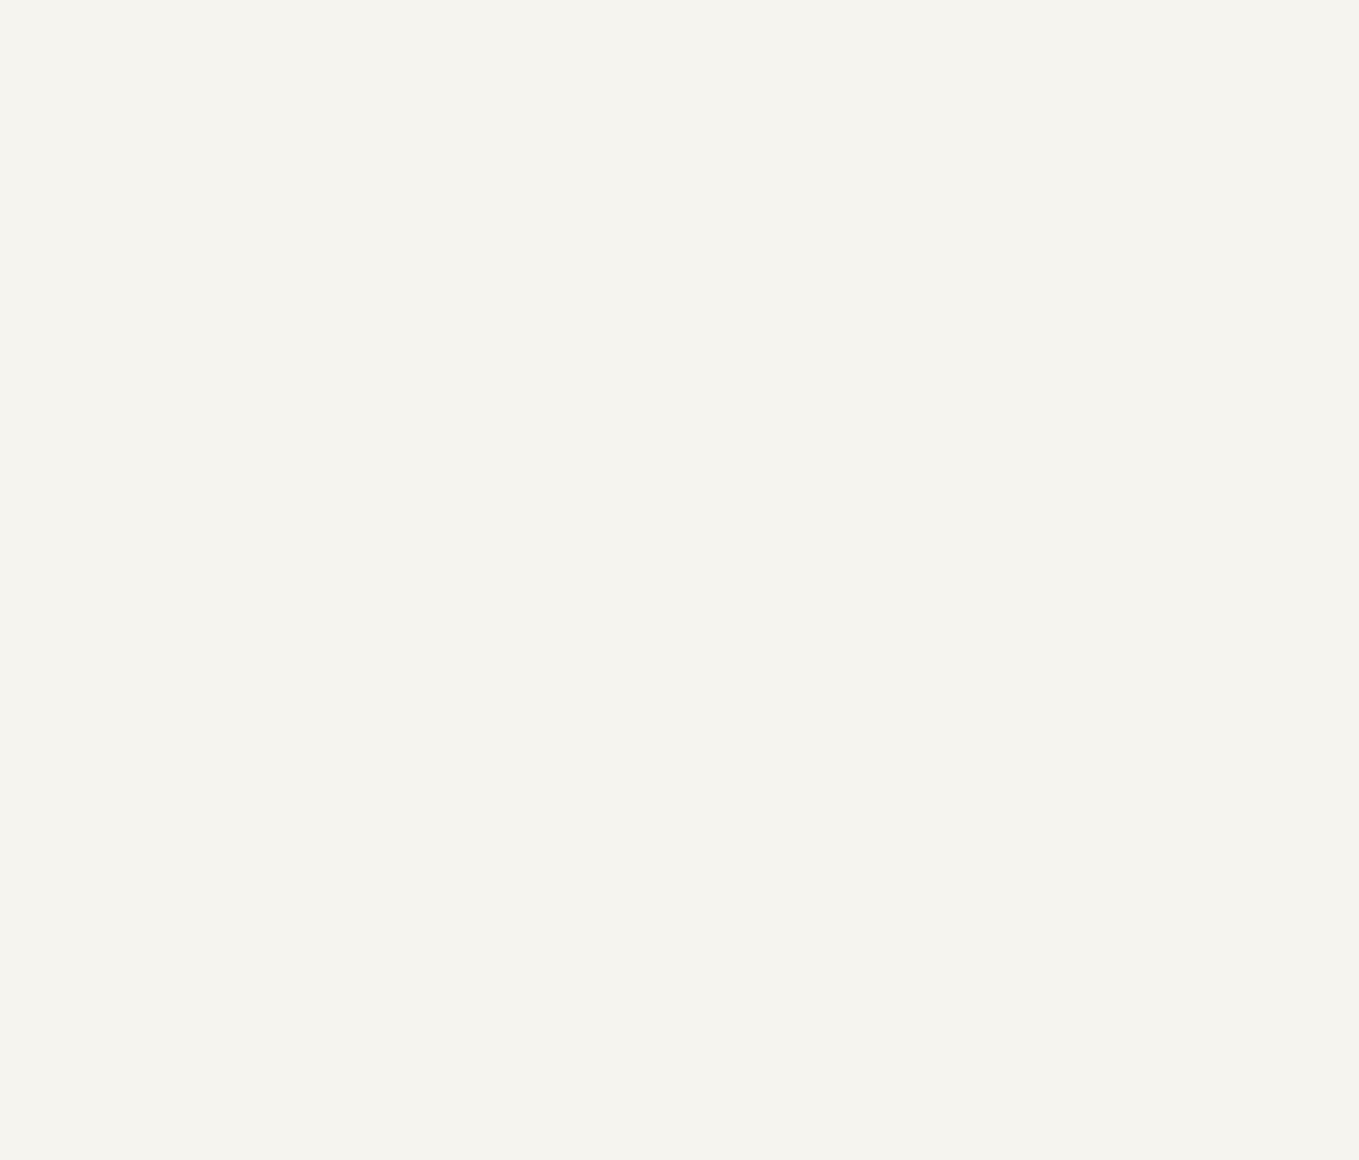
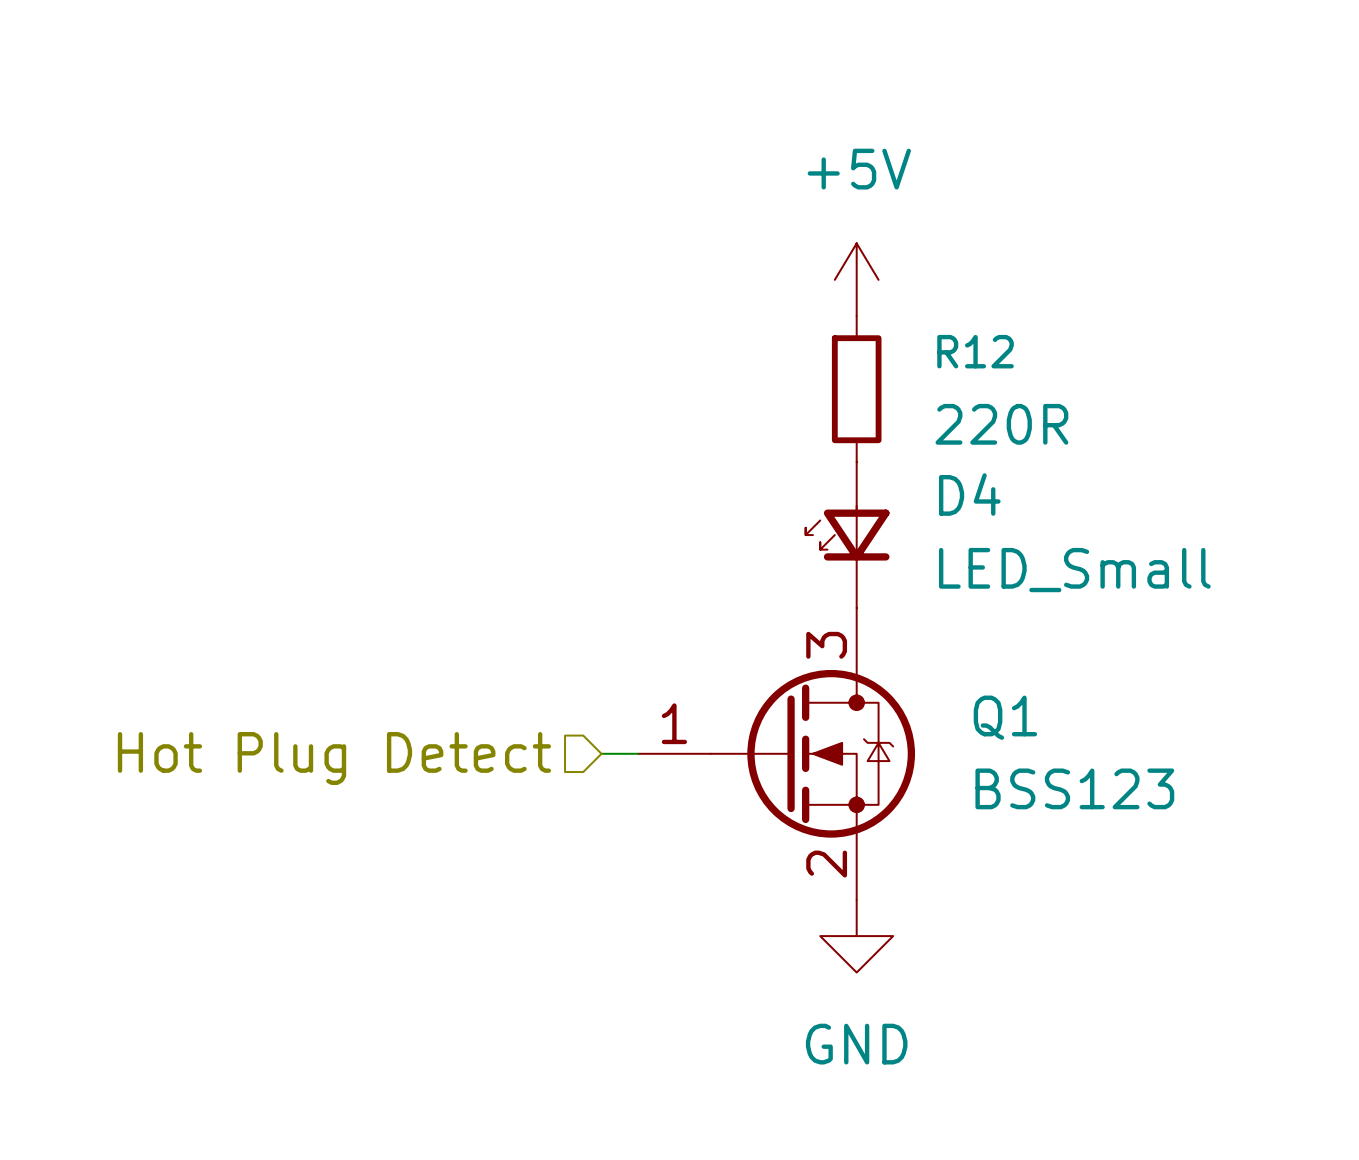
power symbol: none -> +5V (856, 279)
R12: none -> 220R (856, 389)
D4: none -> LED_Small (847, 535)
wire: none -> (601, 753) (637, 753)
Q1: none -> BSS123 (776, 753)
hierarchical label: none -> Hot Plug Detect (334, 758)
power symbol: none -> GND (856, 936)

